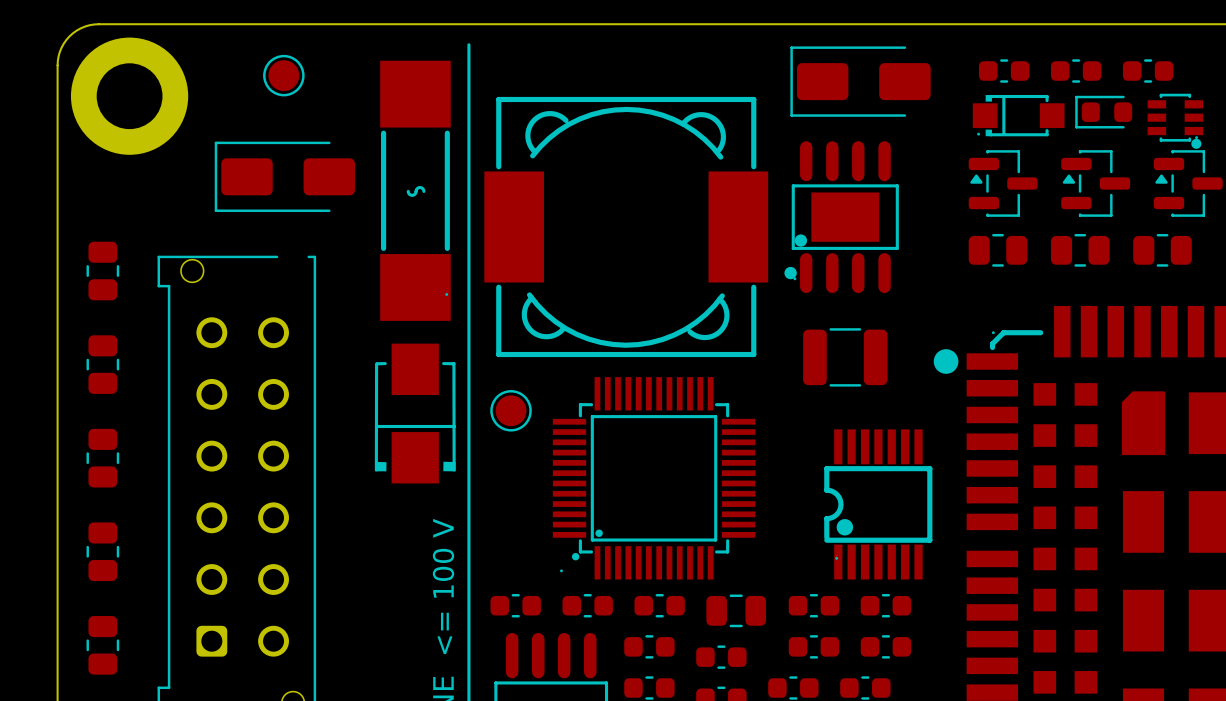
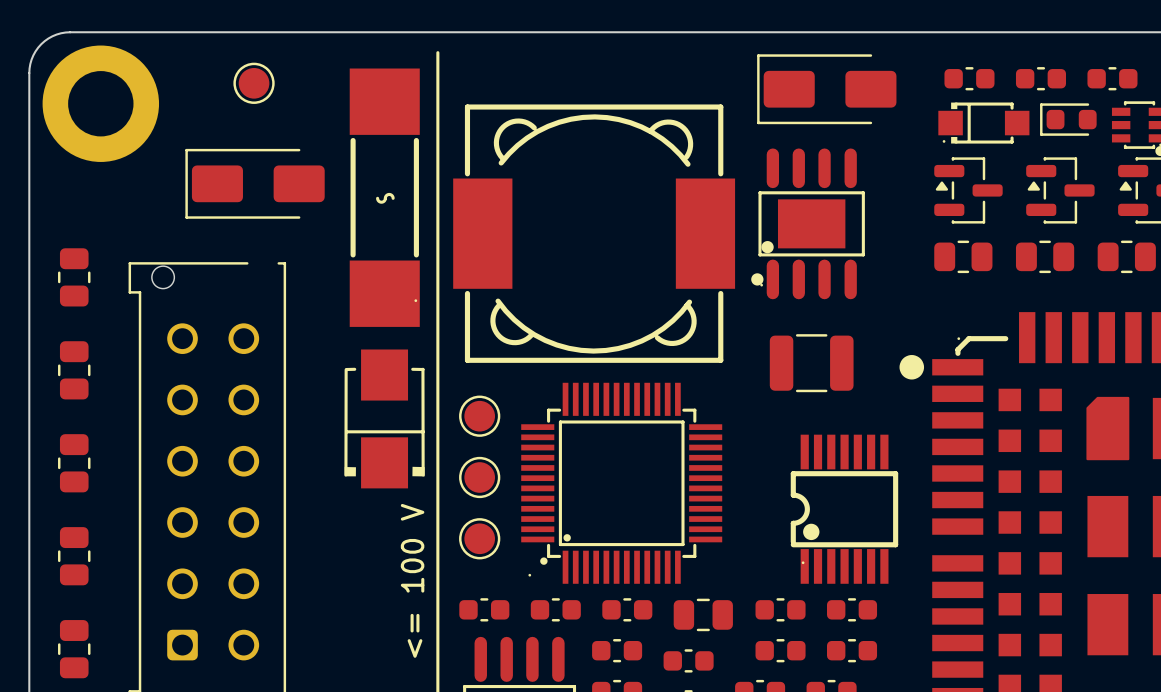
part: none -> (479, 477)
part: none -> (479, 538)

